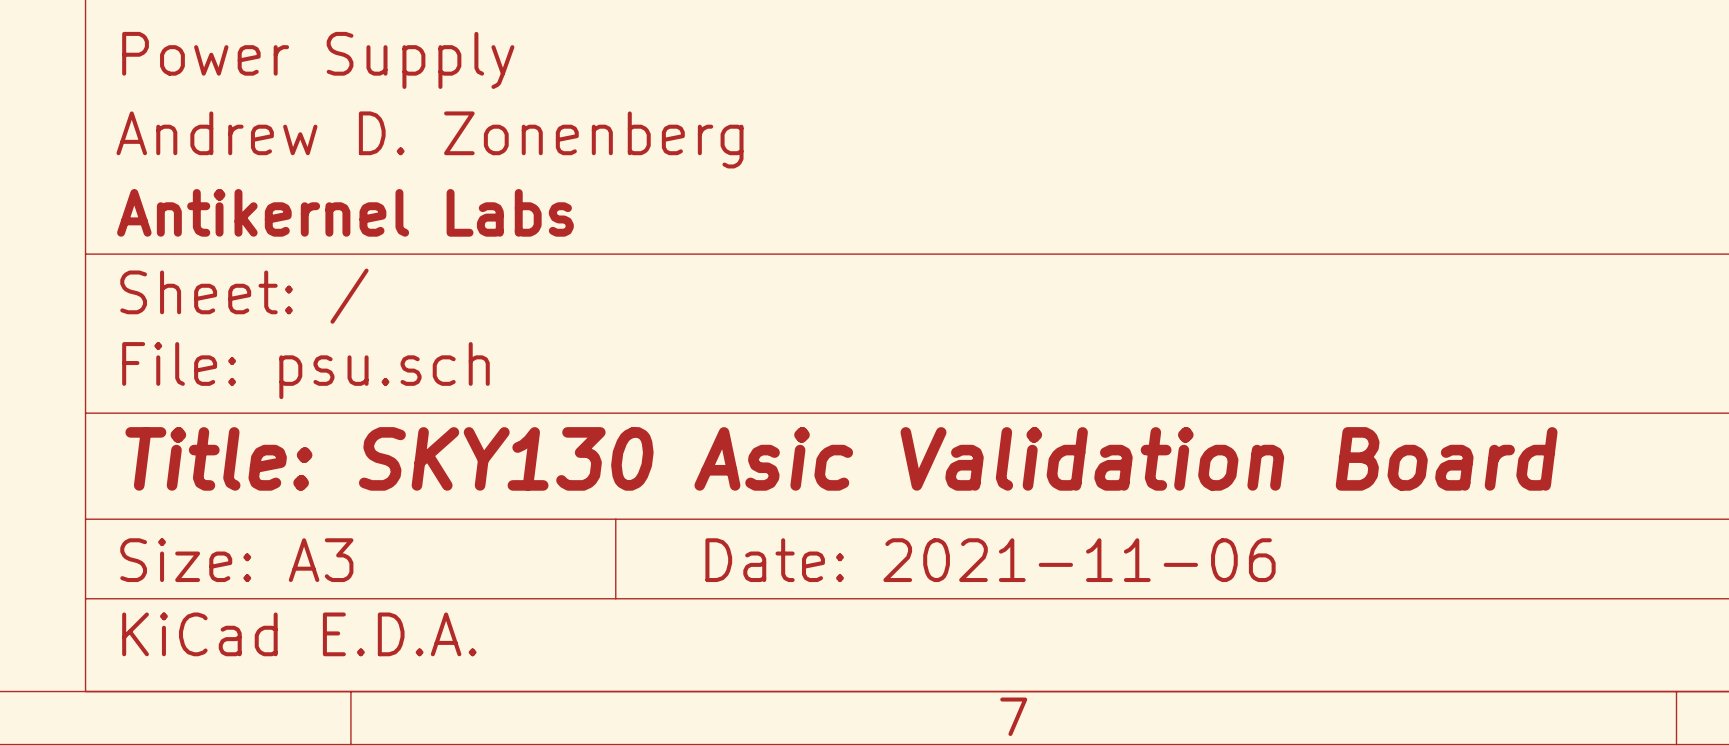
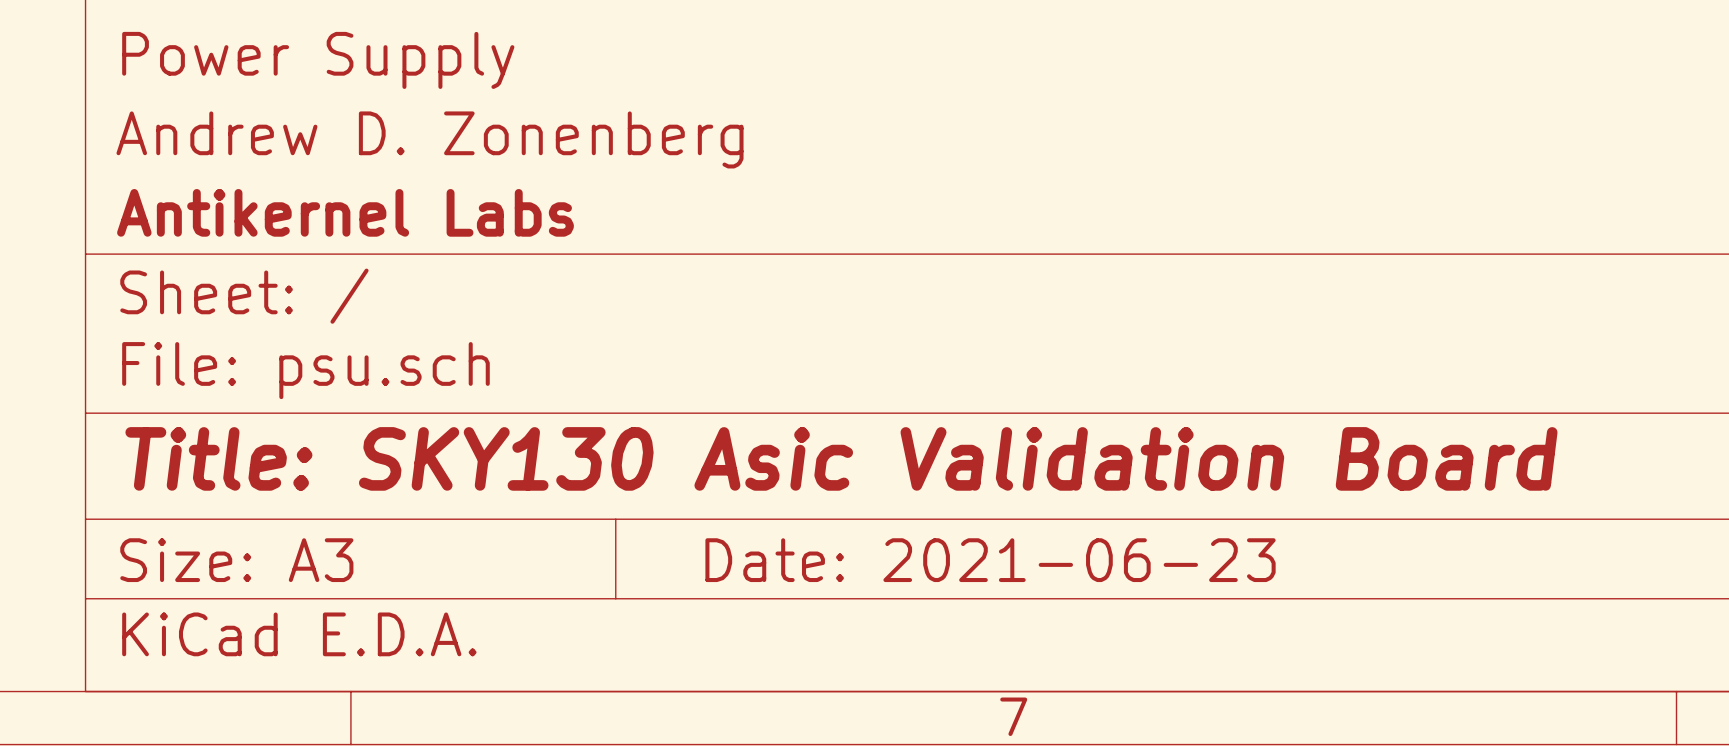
title block: Date: 2021-11-06 (990, 560) -> Date: 2021-06-23 (990, 560)

